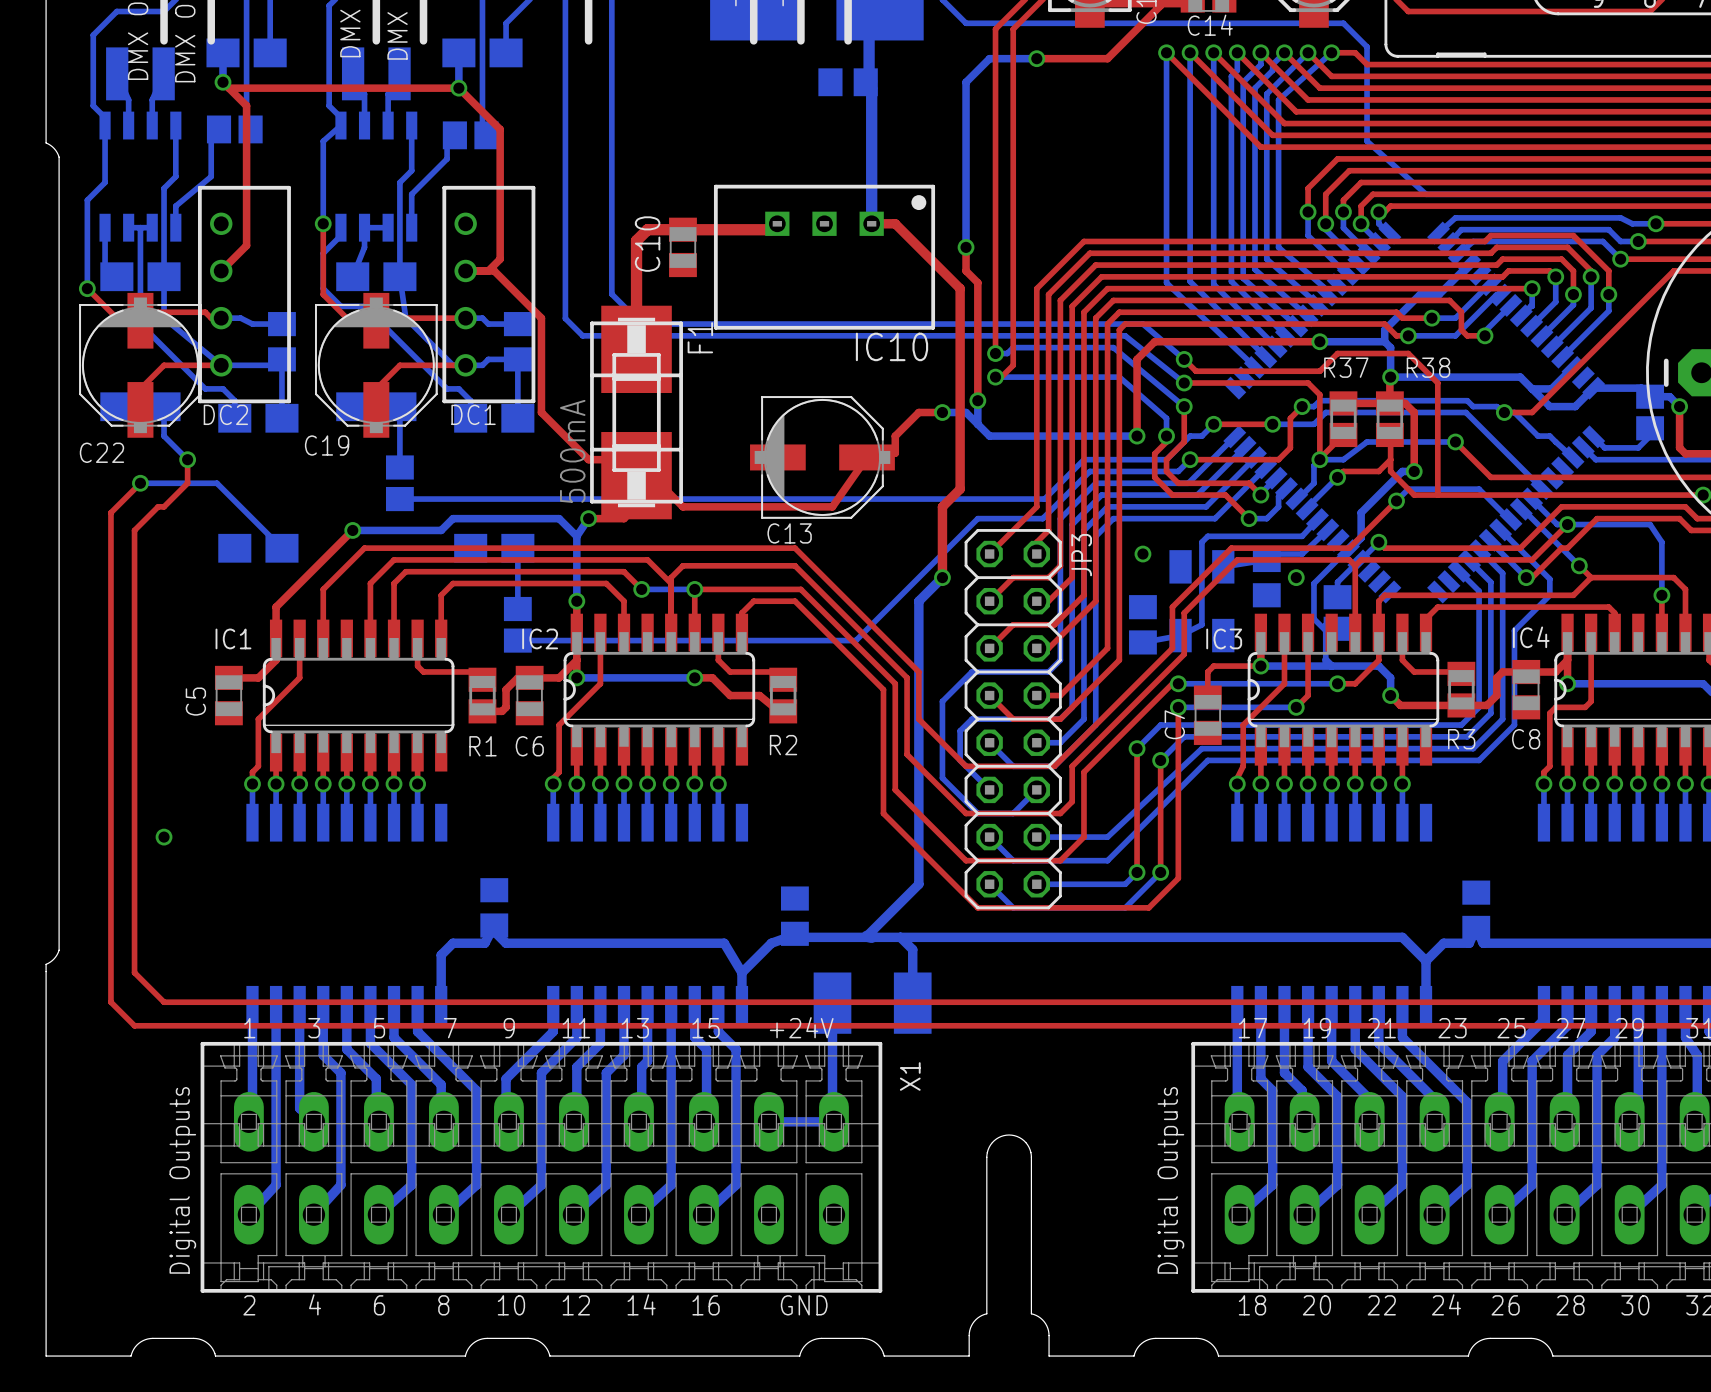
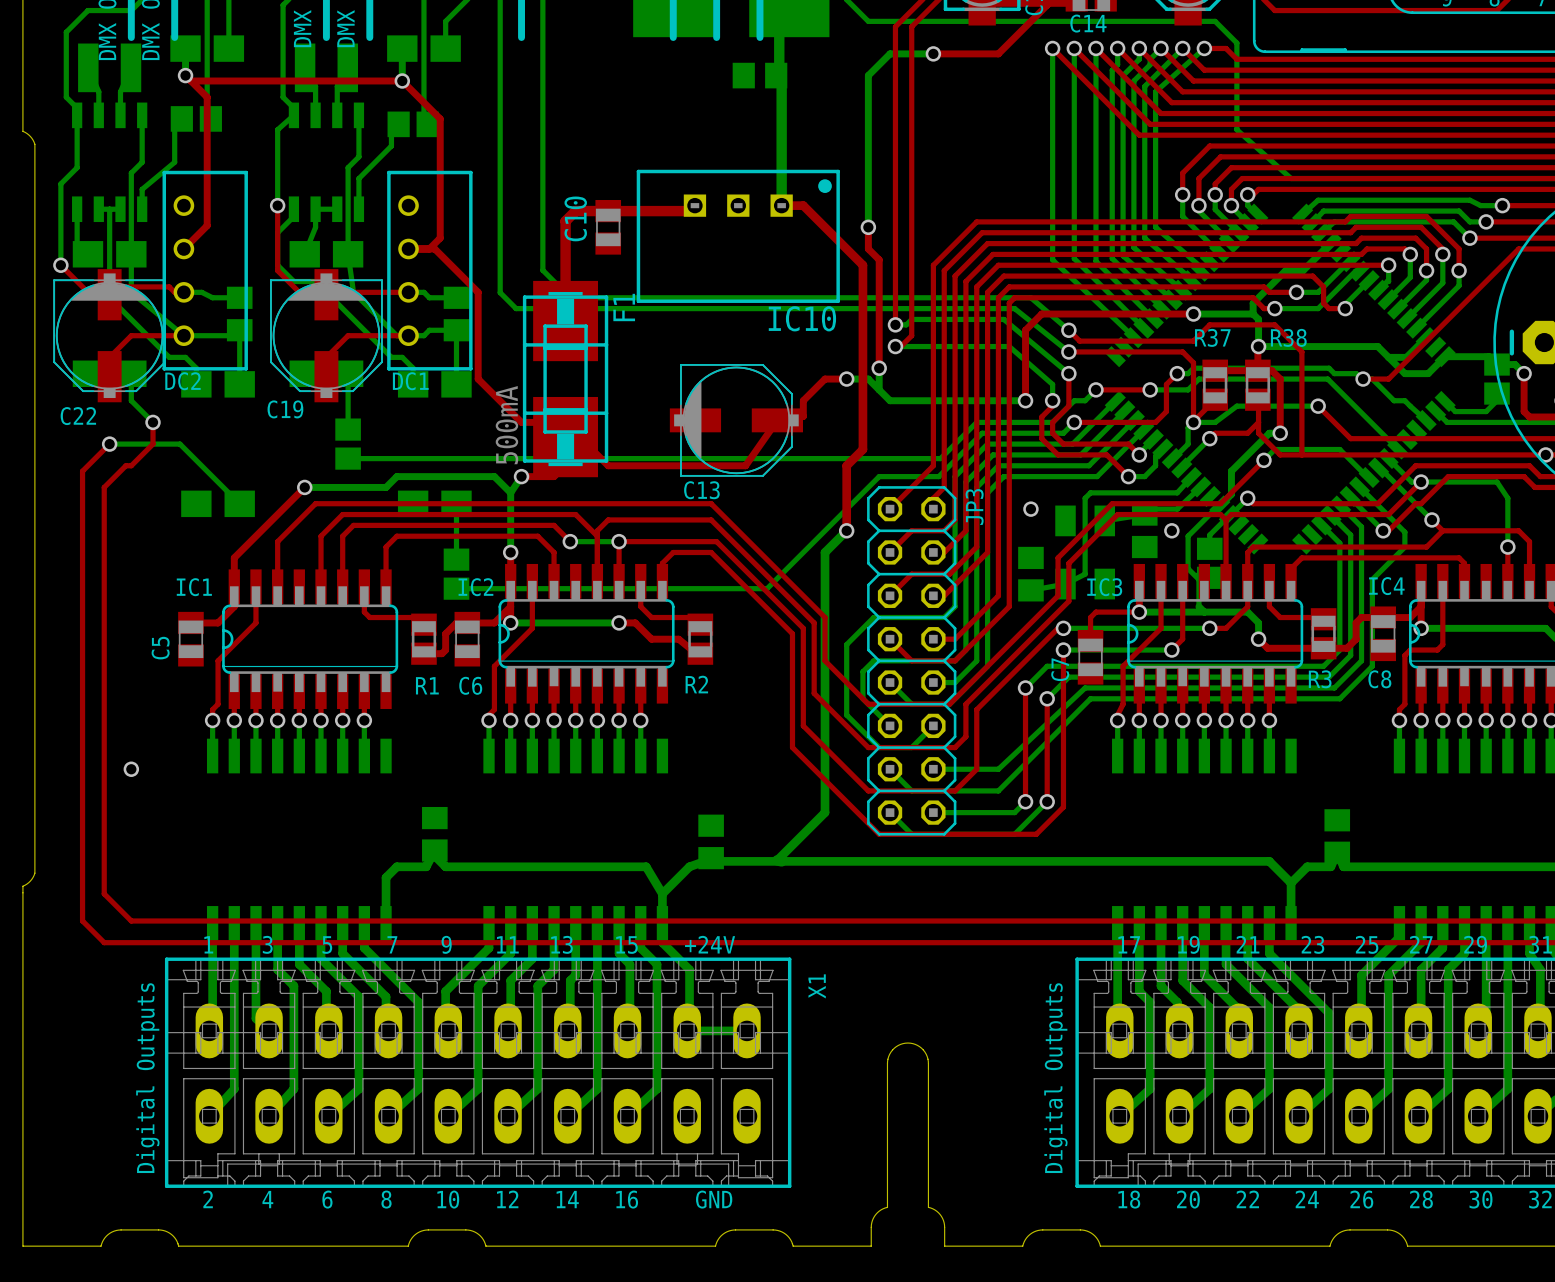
bottom track: (900, 937) (912, 949) (912, 1003) -> none
bottom track: (832, 1003) (833, 1121) -> none
part: (872, 1003) -> none
bottom track: none -> (662, 923) (662, 942) (689, 969) (689, 1028) (687, 1030)

